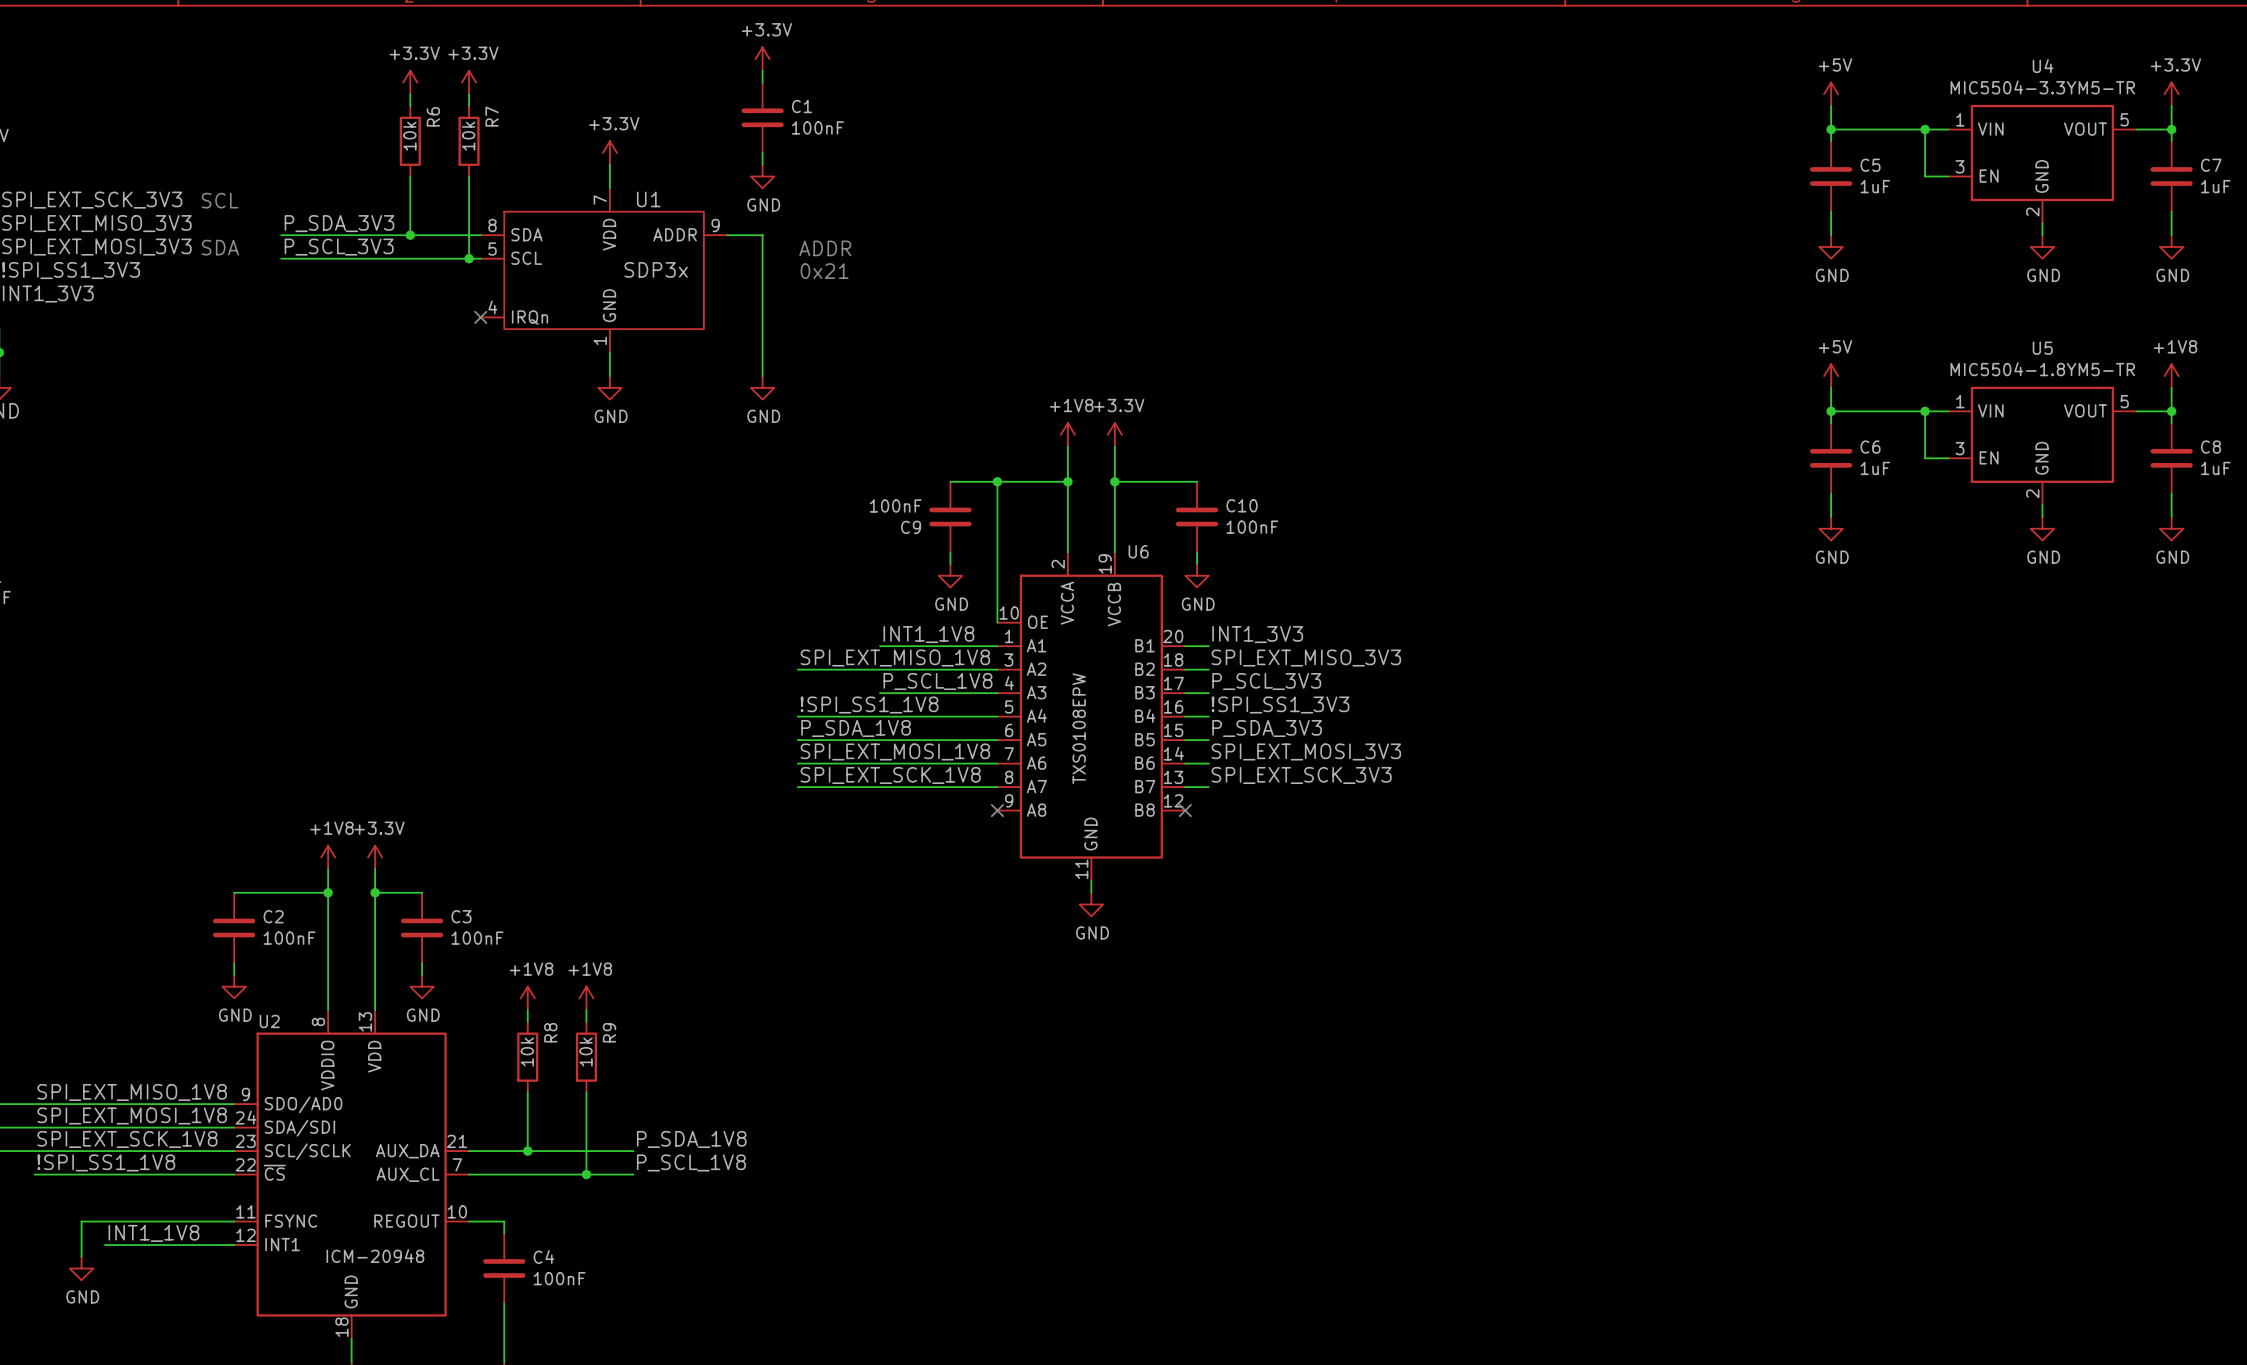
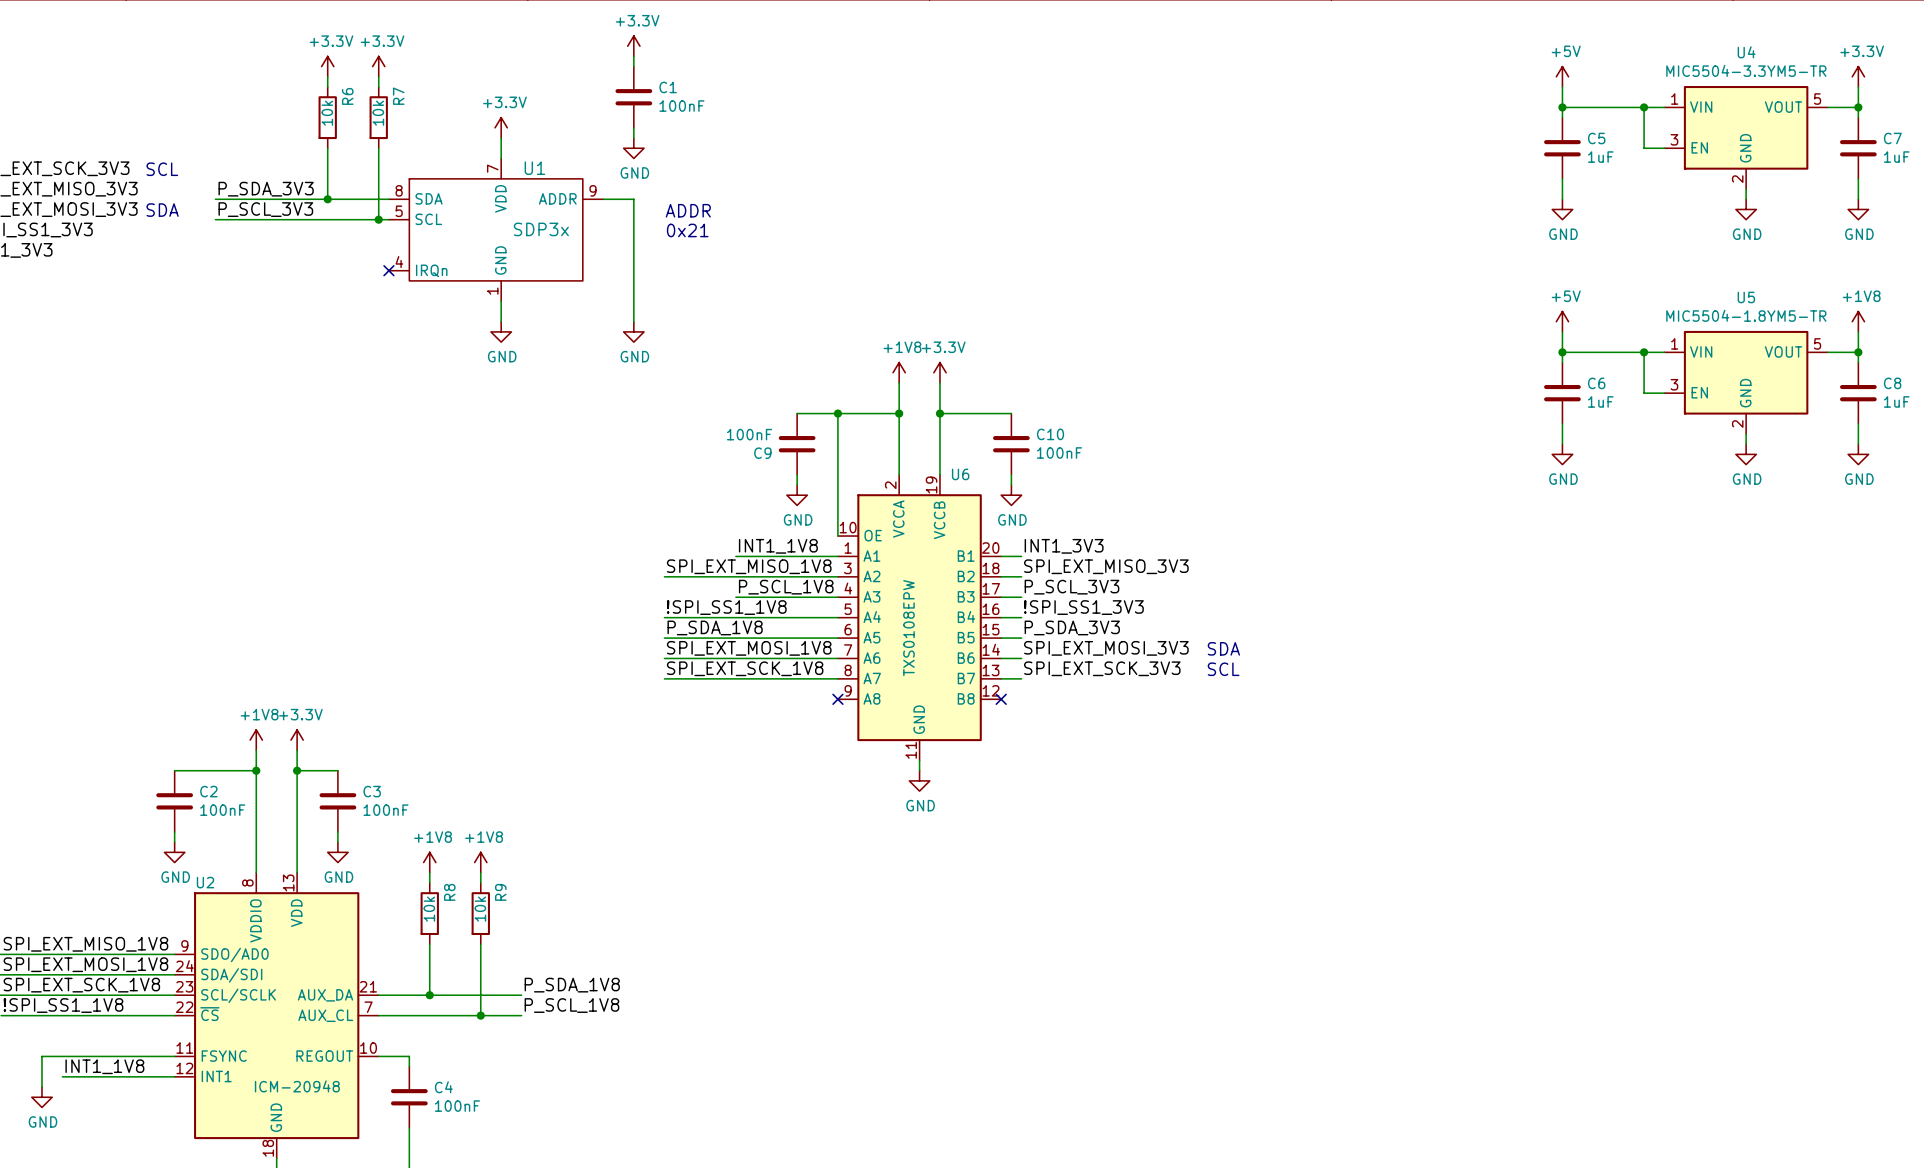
text: none -> SDA (1223, 648)
text: none -> SCL (1223, 669)

